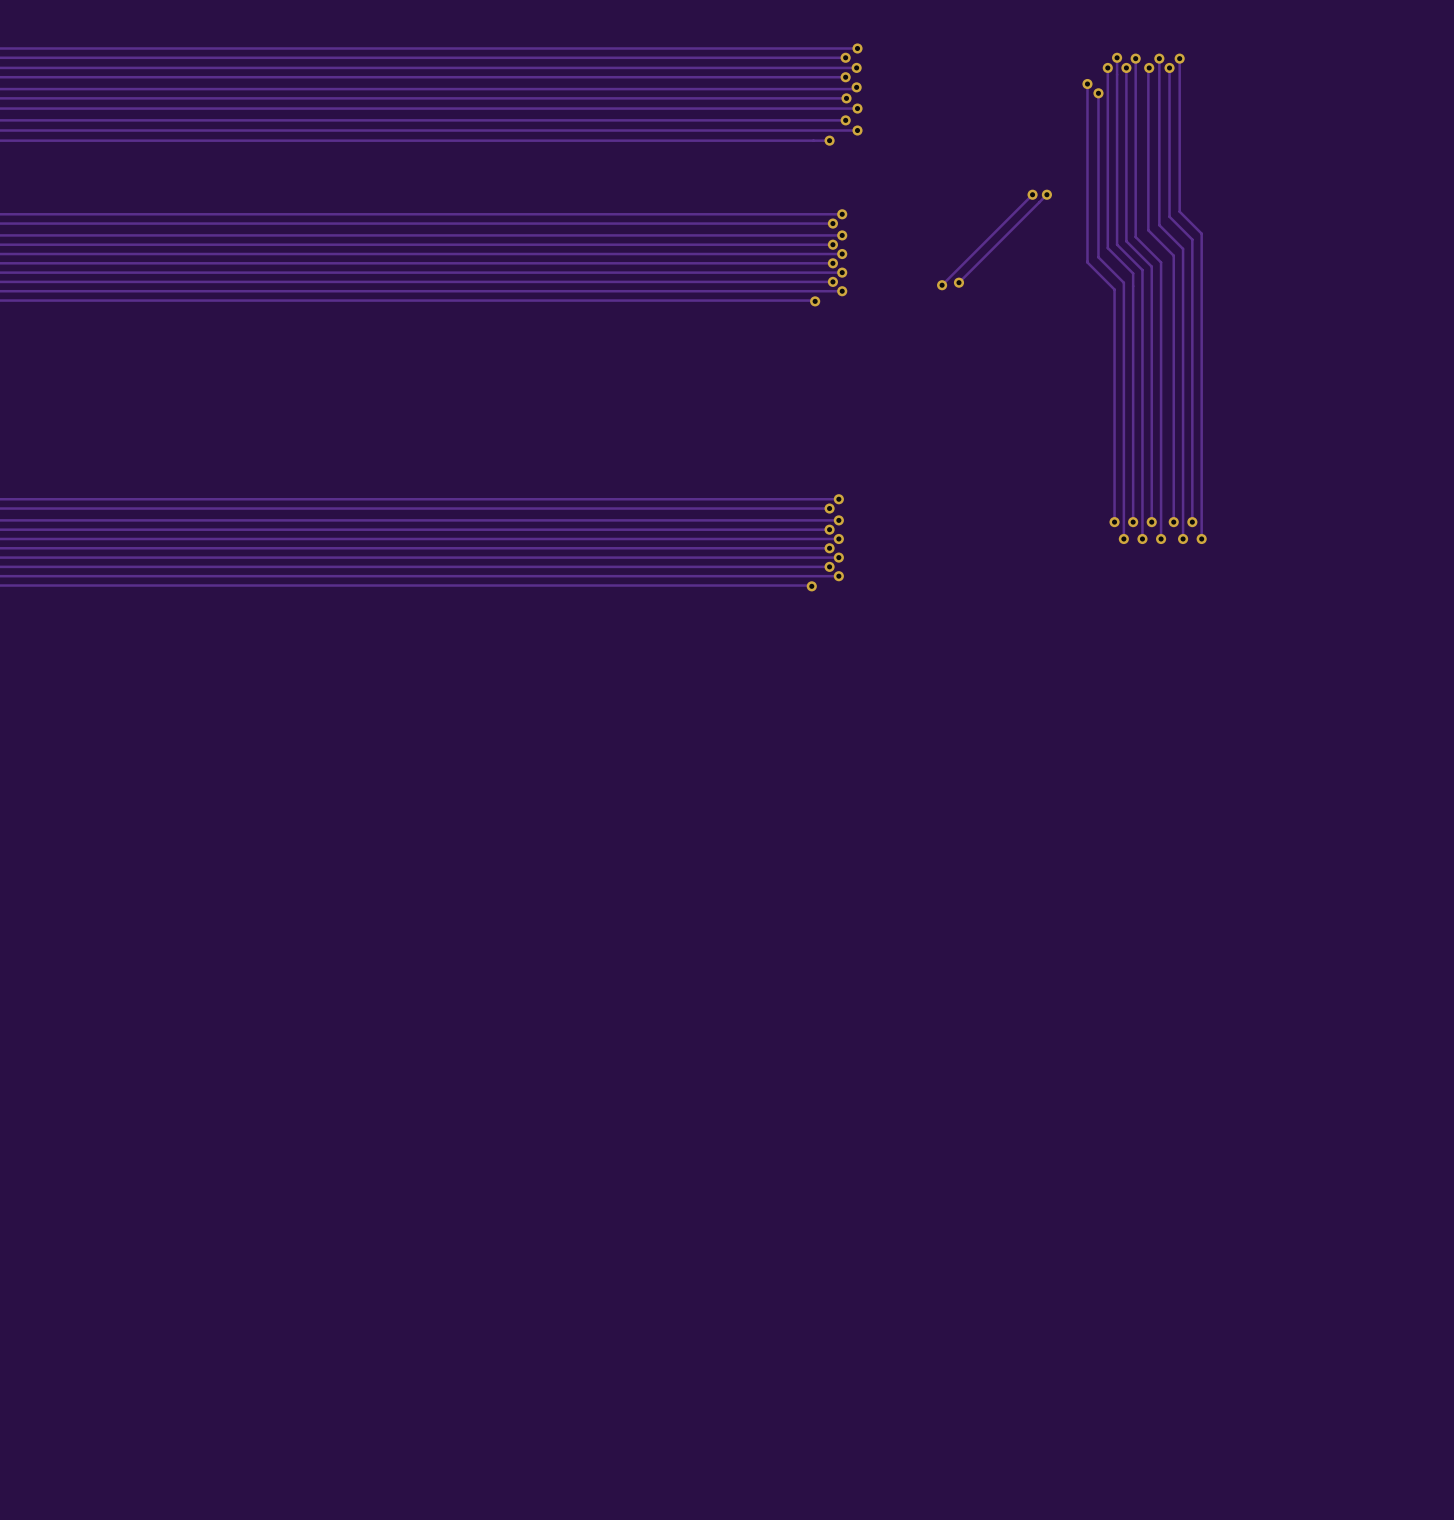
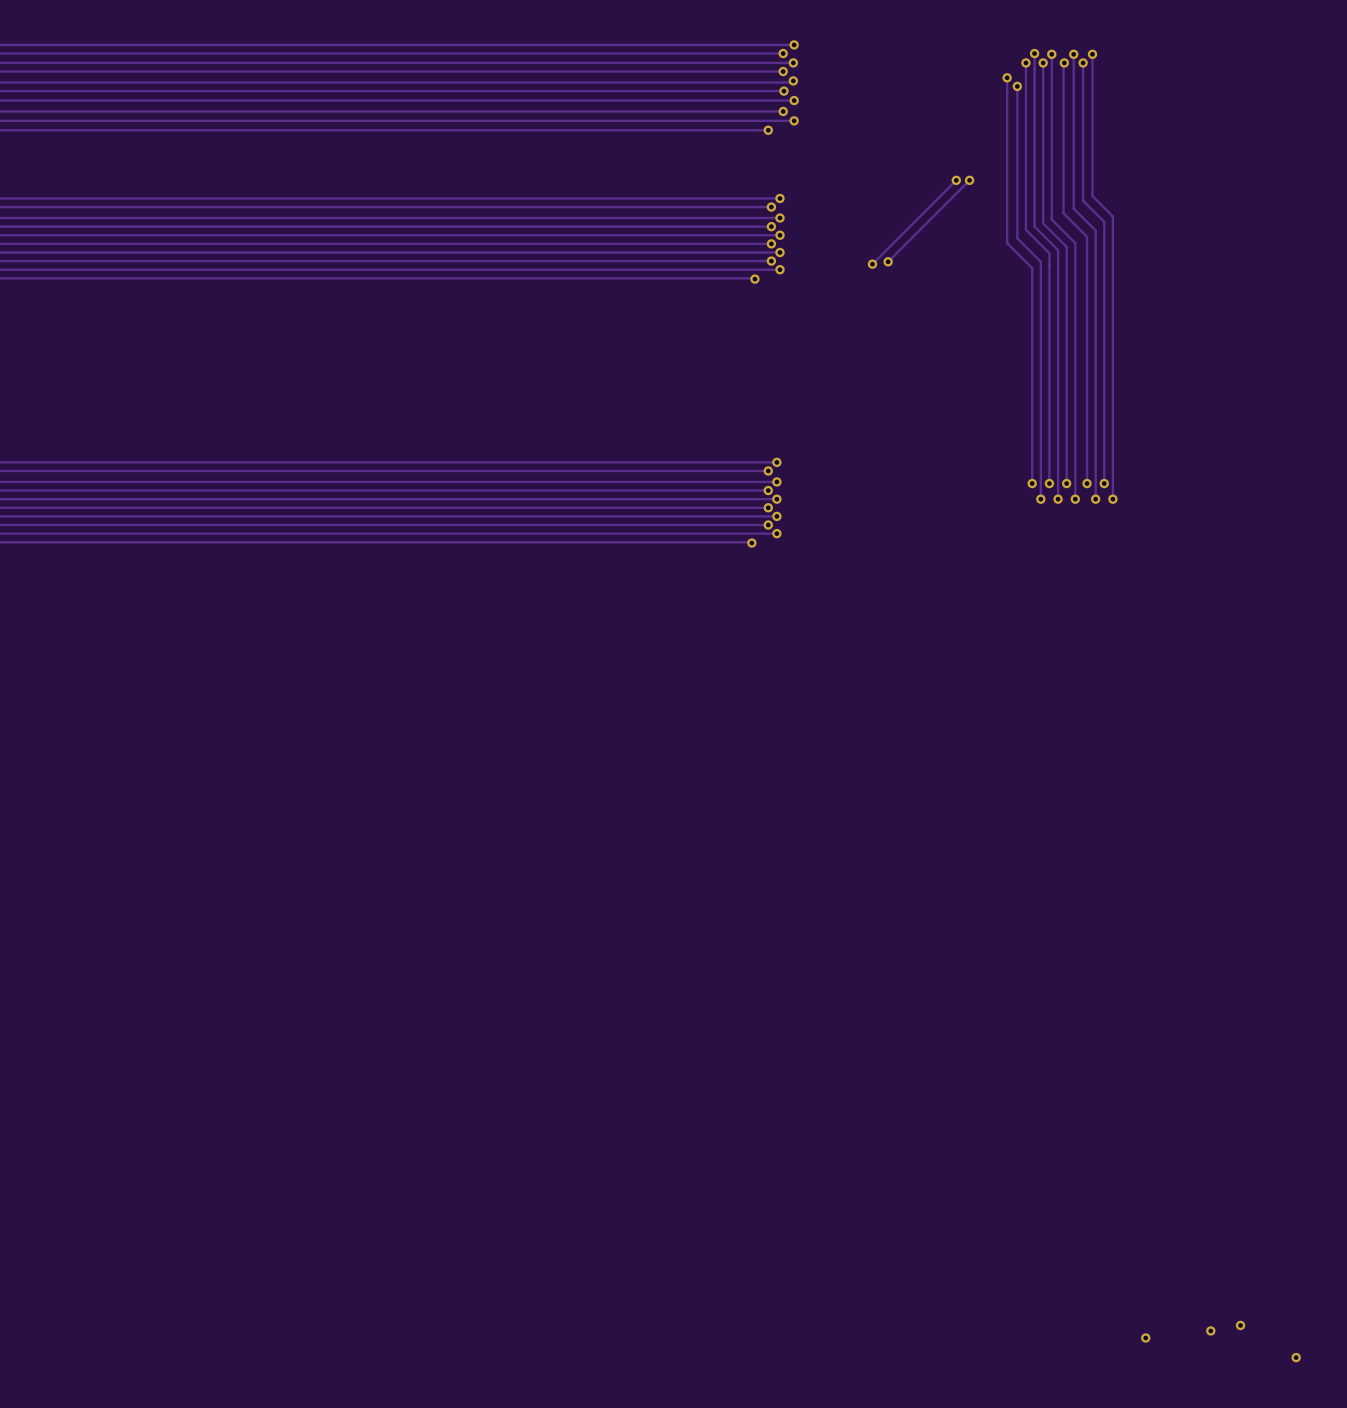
via: none -> (1240, 1325)
via: none -> (1210, 1330)
via: none -> (1145, 1337)
via: none -> (1296, 1357)

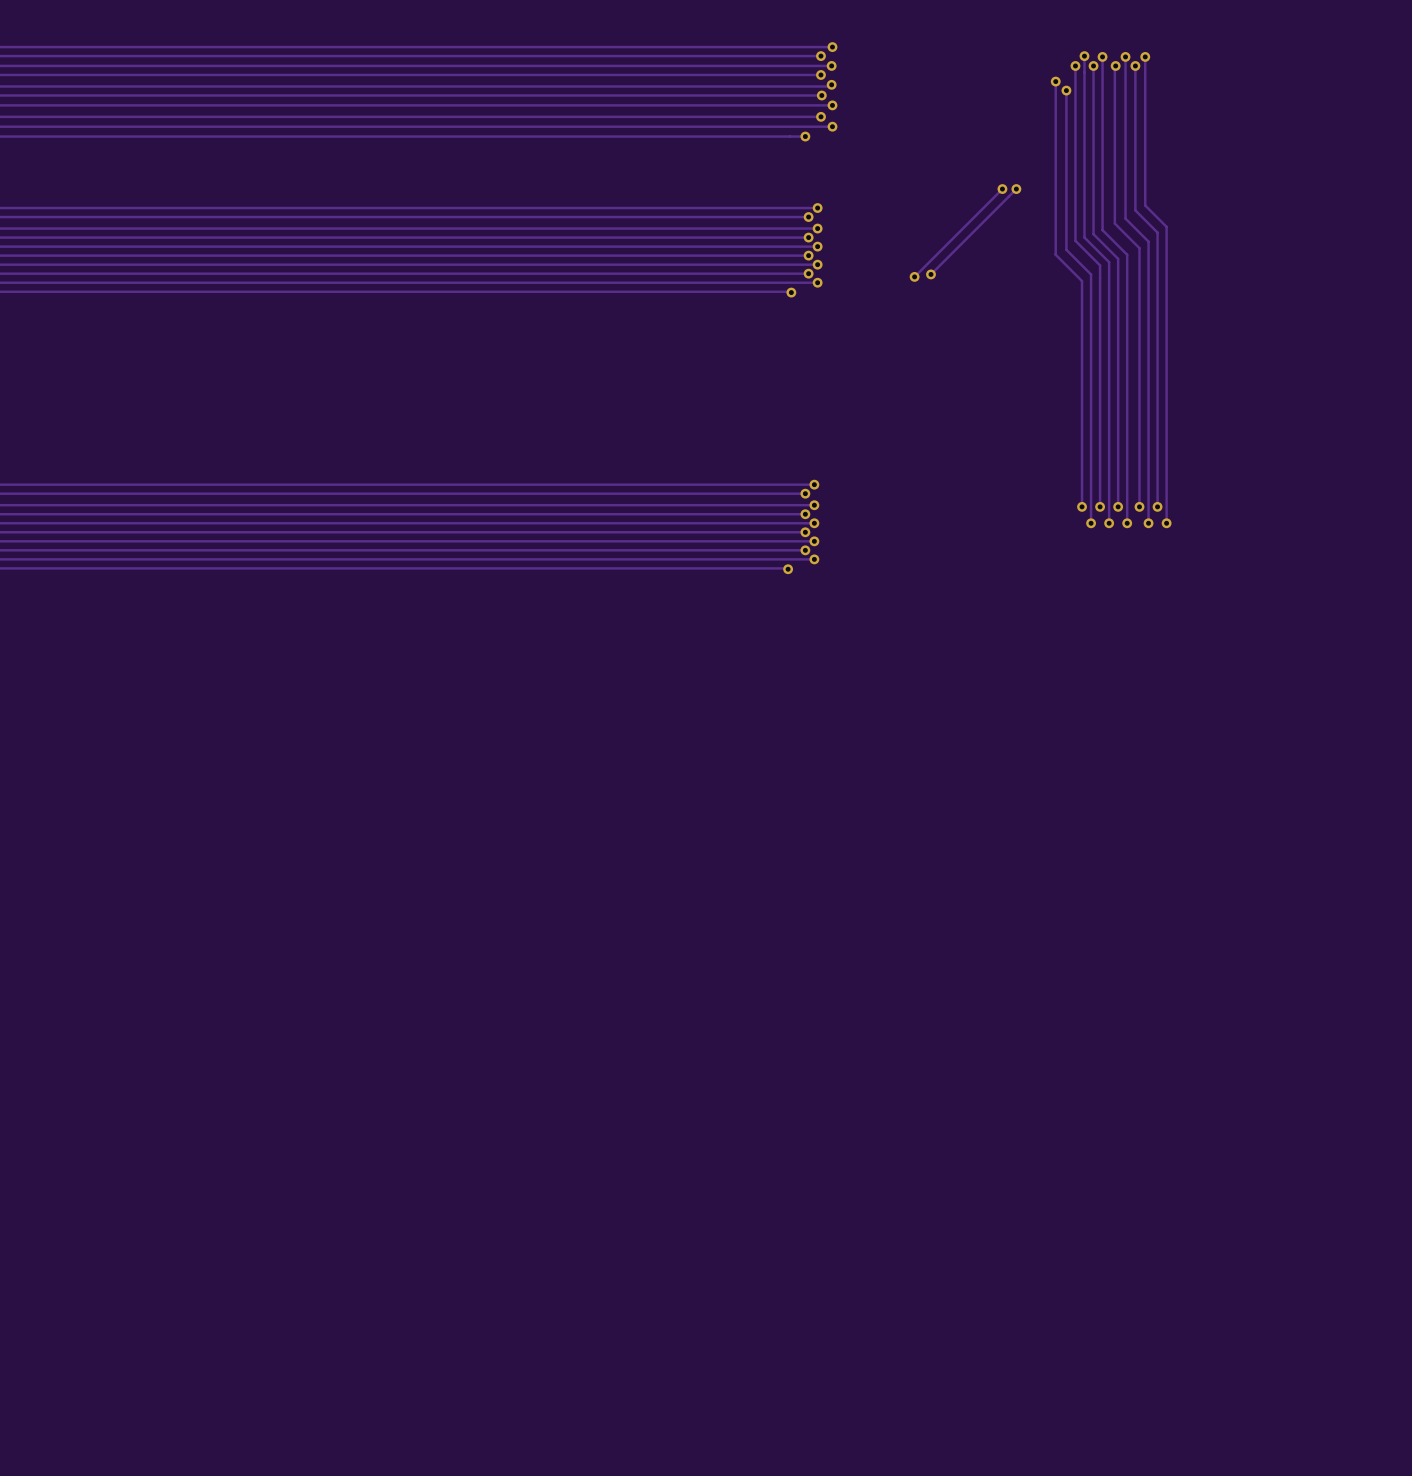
via: (1240, 1325) -> none
via: (1210, 1330) -> none
via: (1145, 1337) -> none
via: (1296, 1357) -> none

